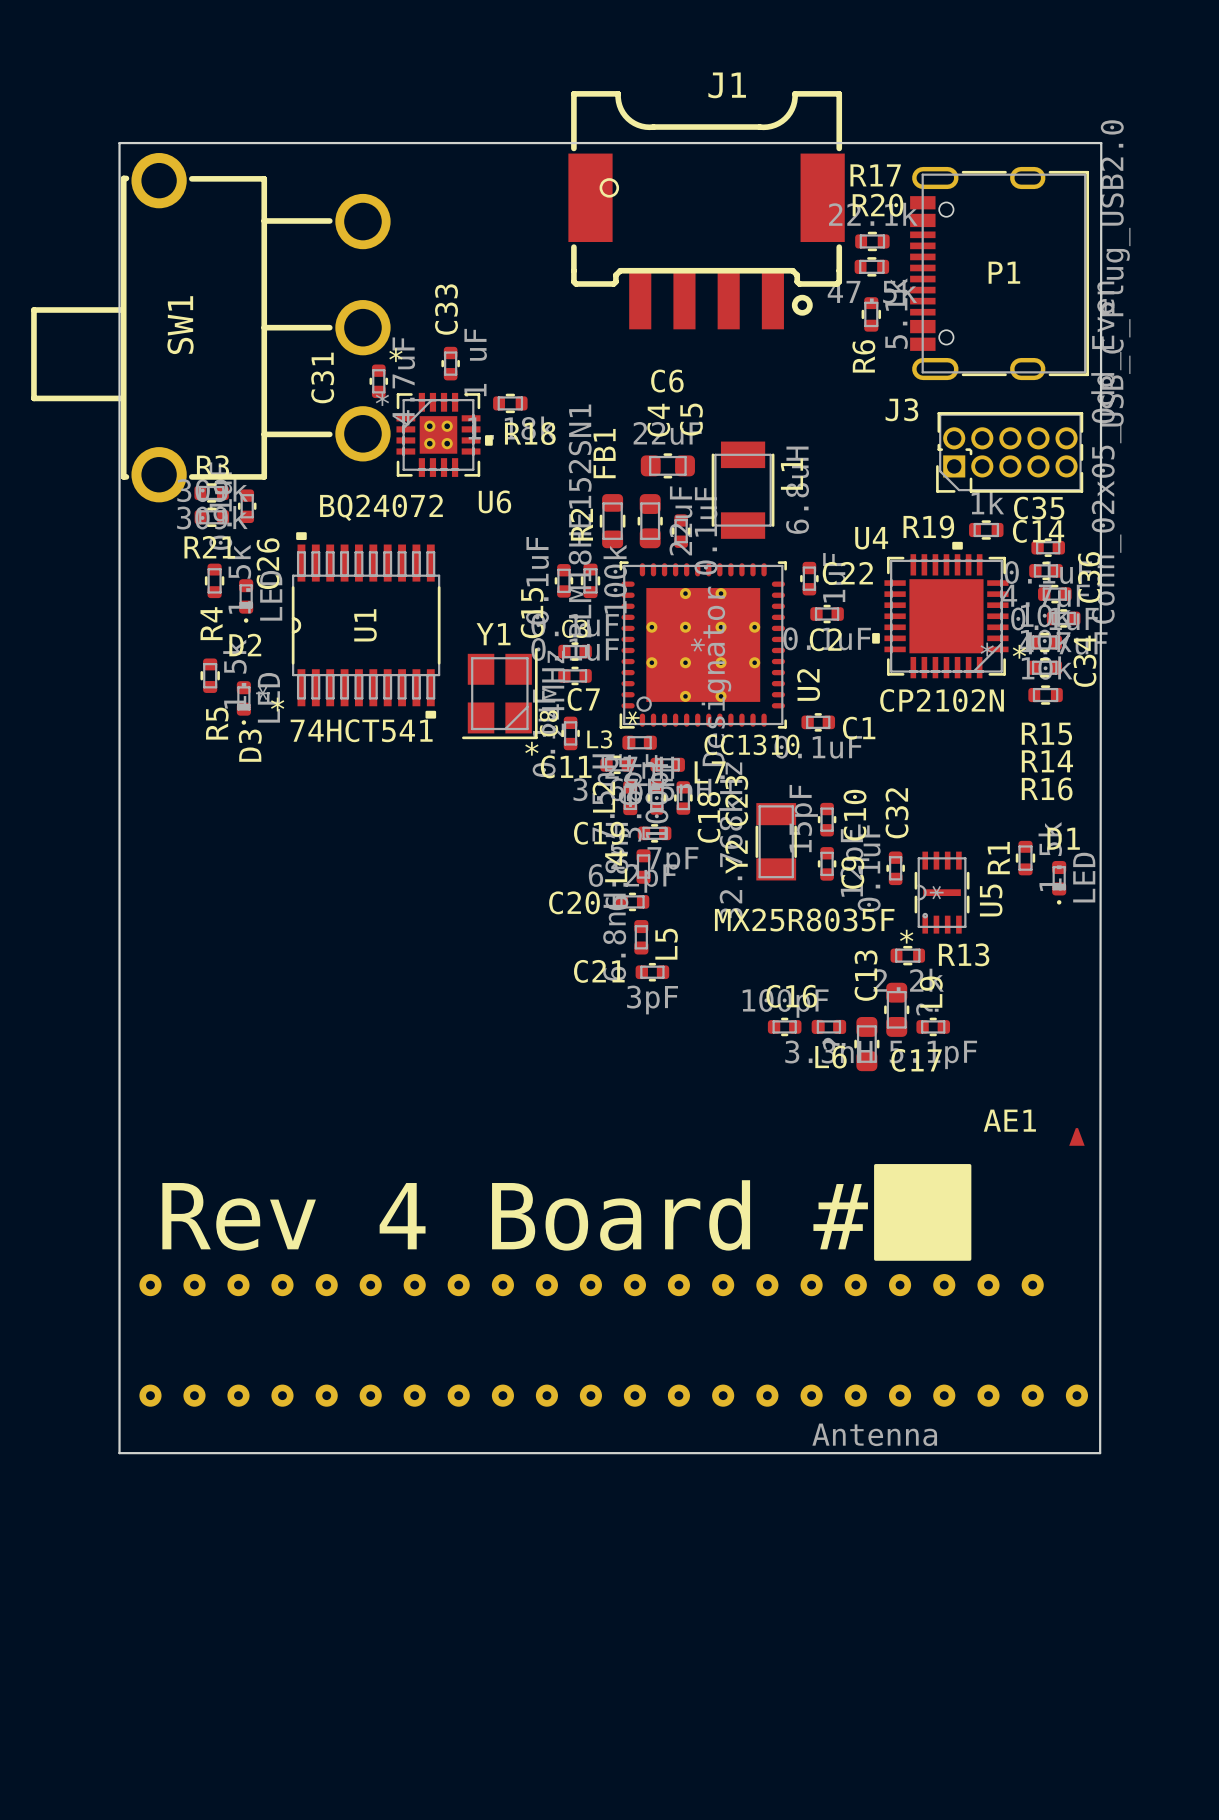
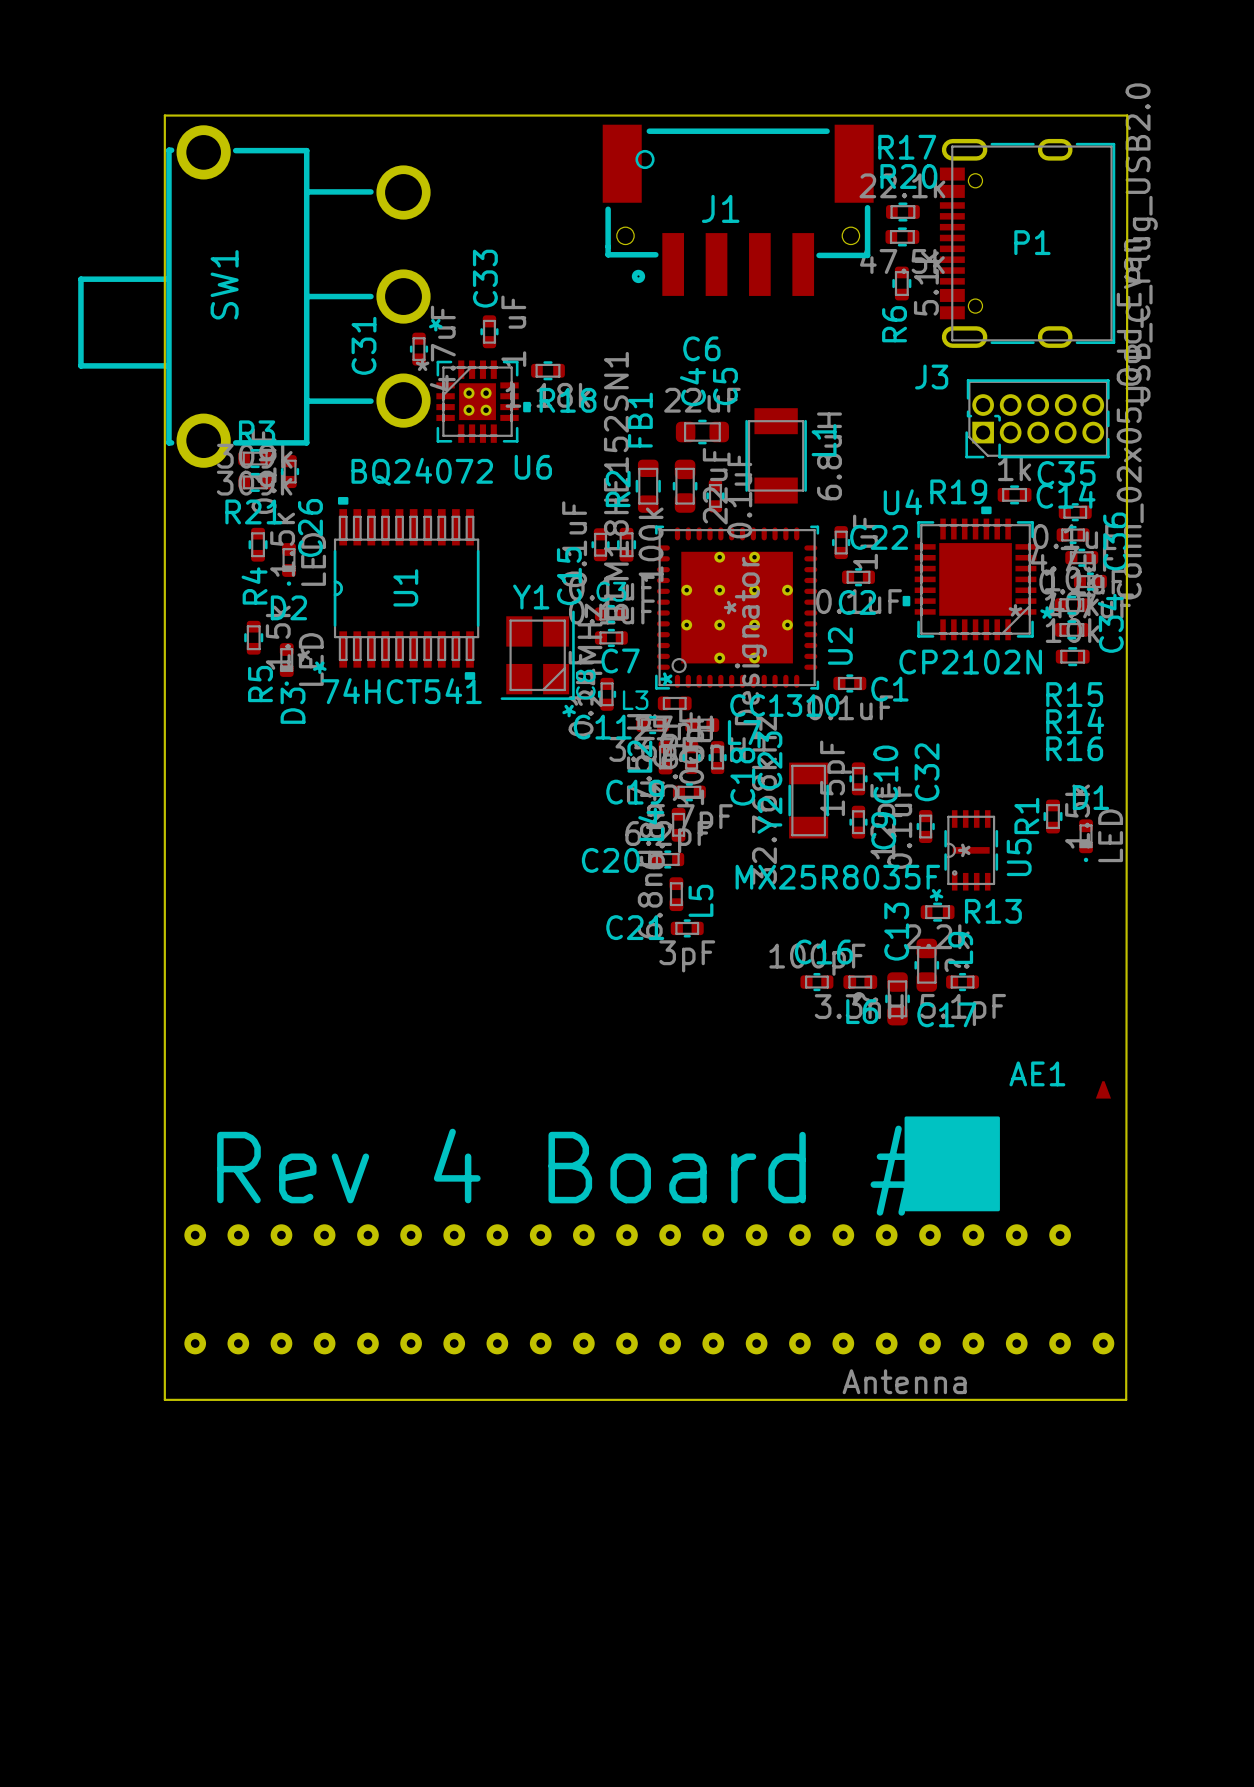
J1 name position: J1 (727, 85) -> J1 (720, 208)
J1 footprint: [568, 91, 845, 330] -> [602, 124, 874, 296]

